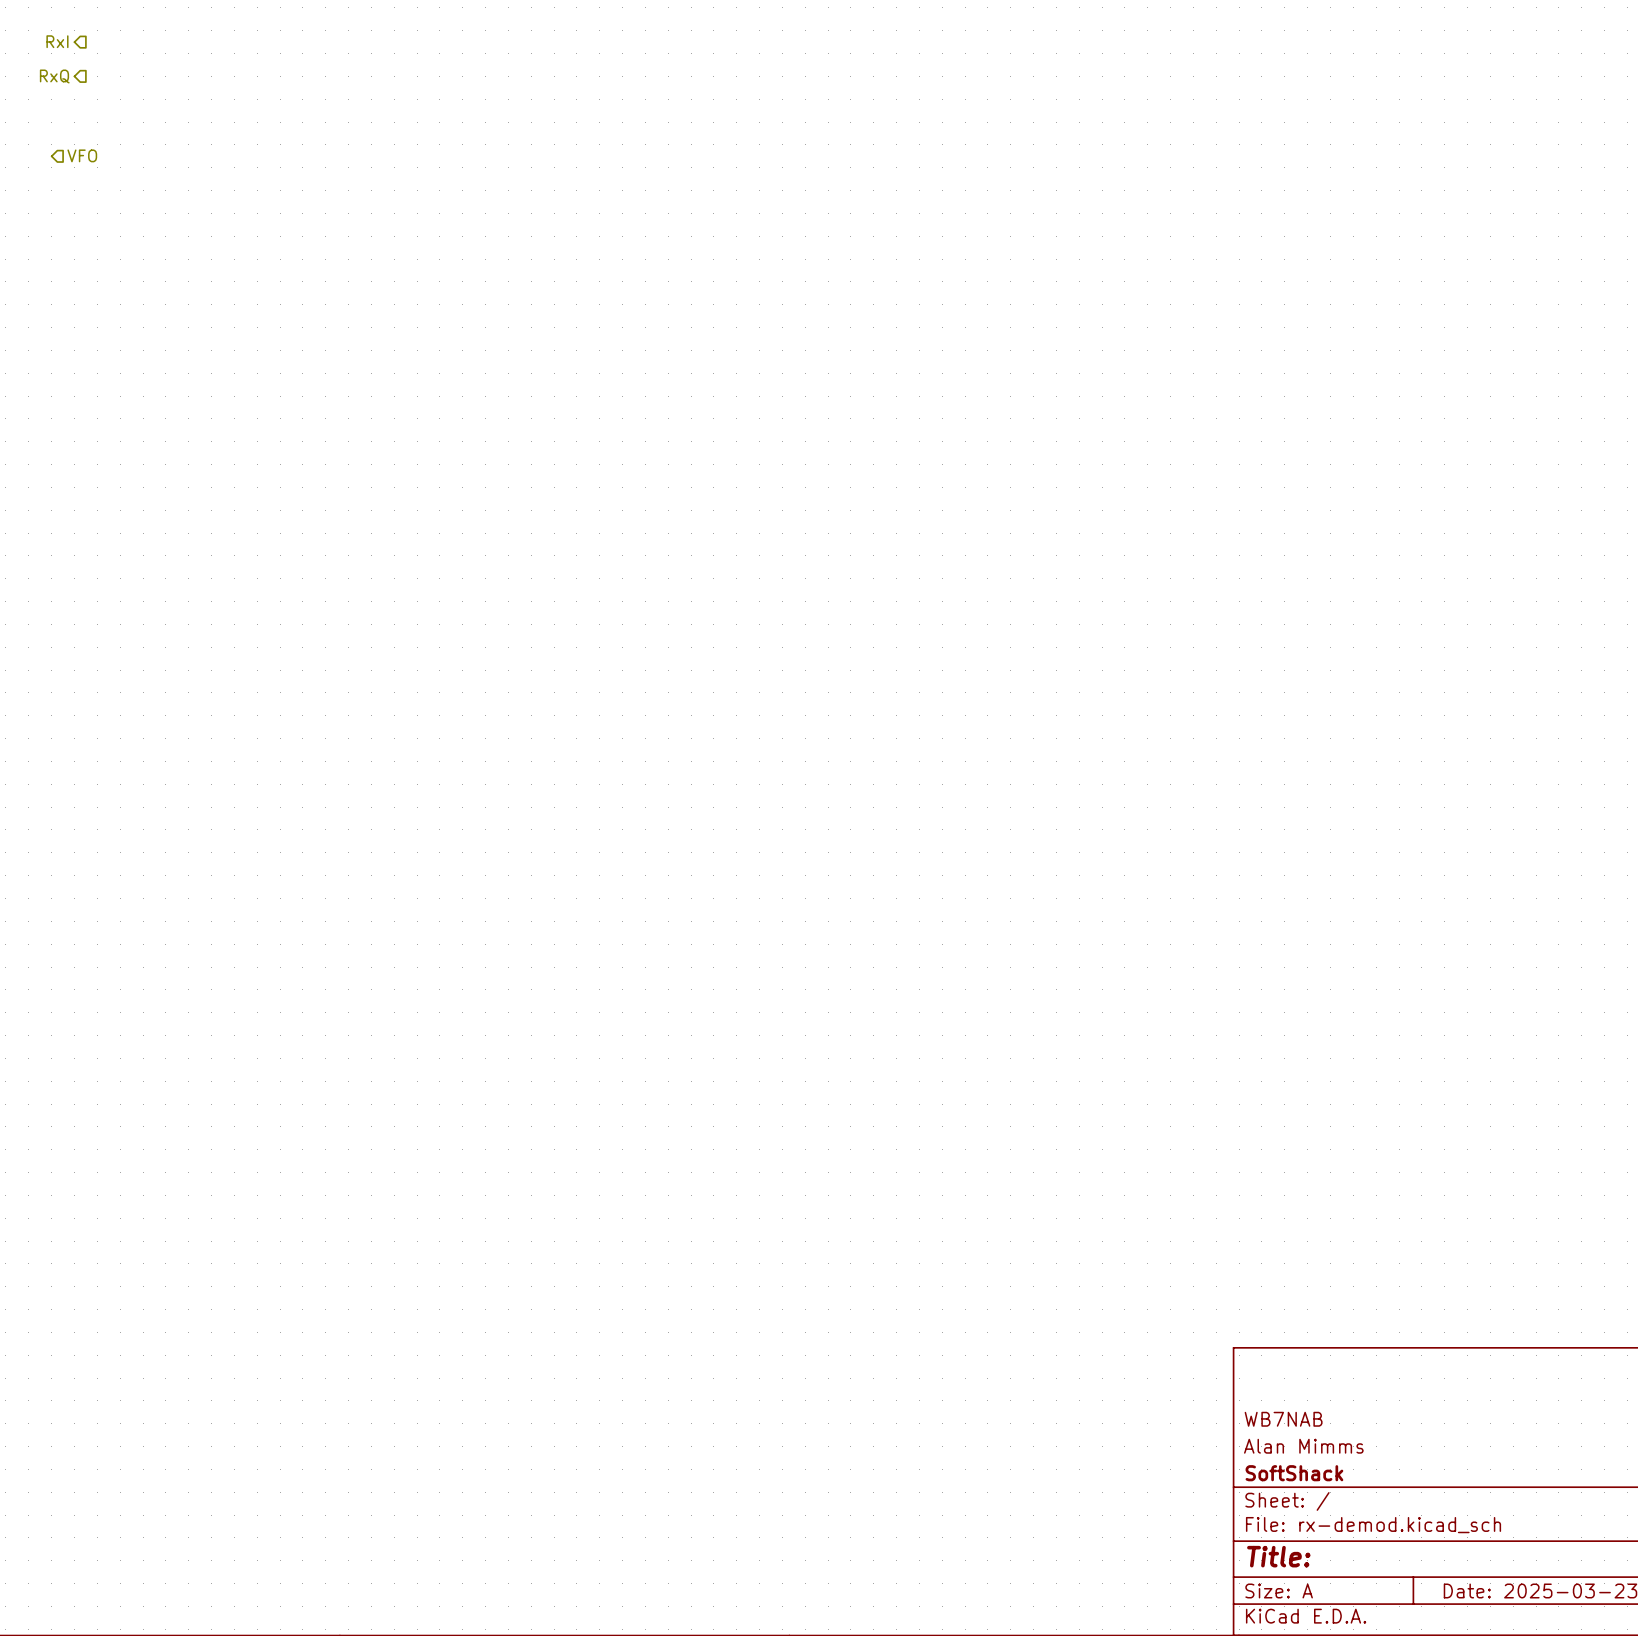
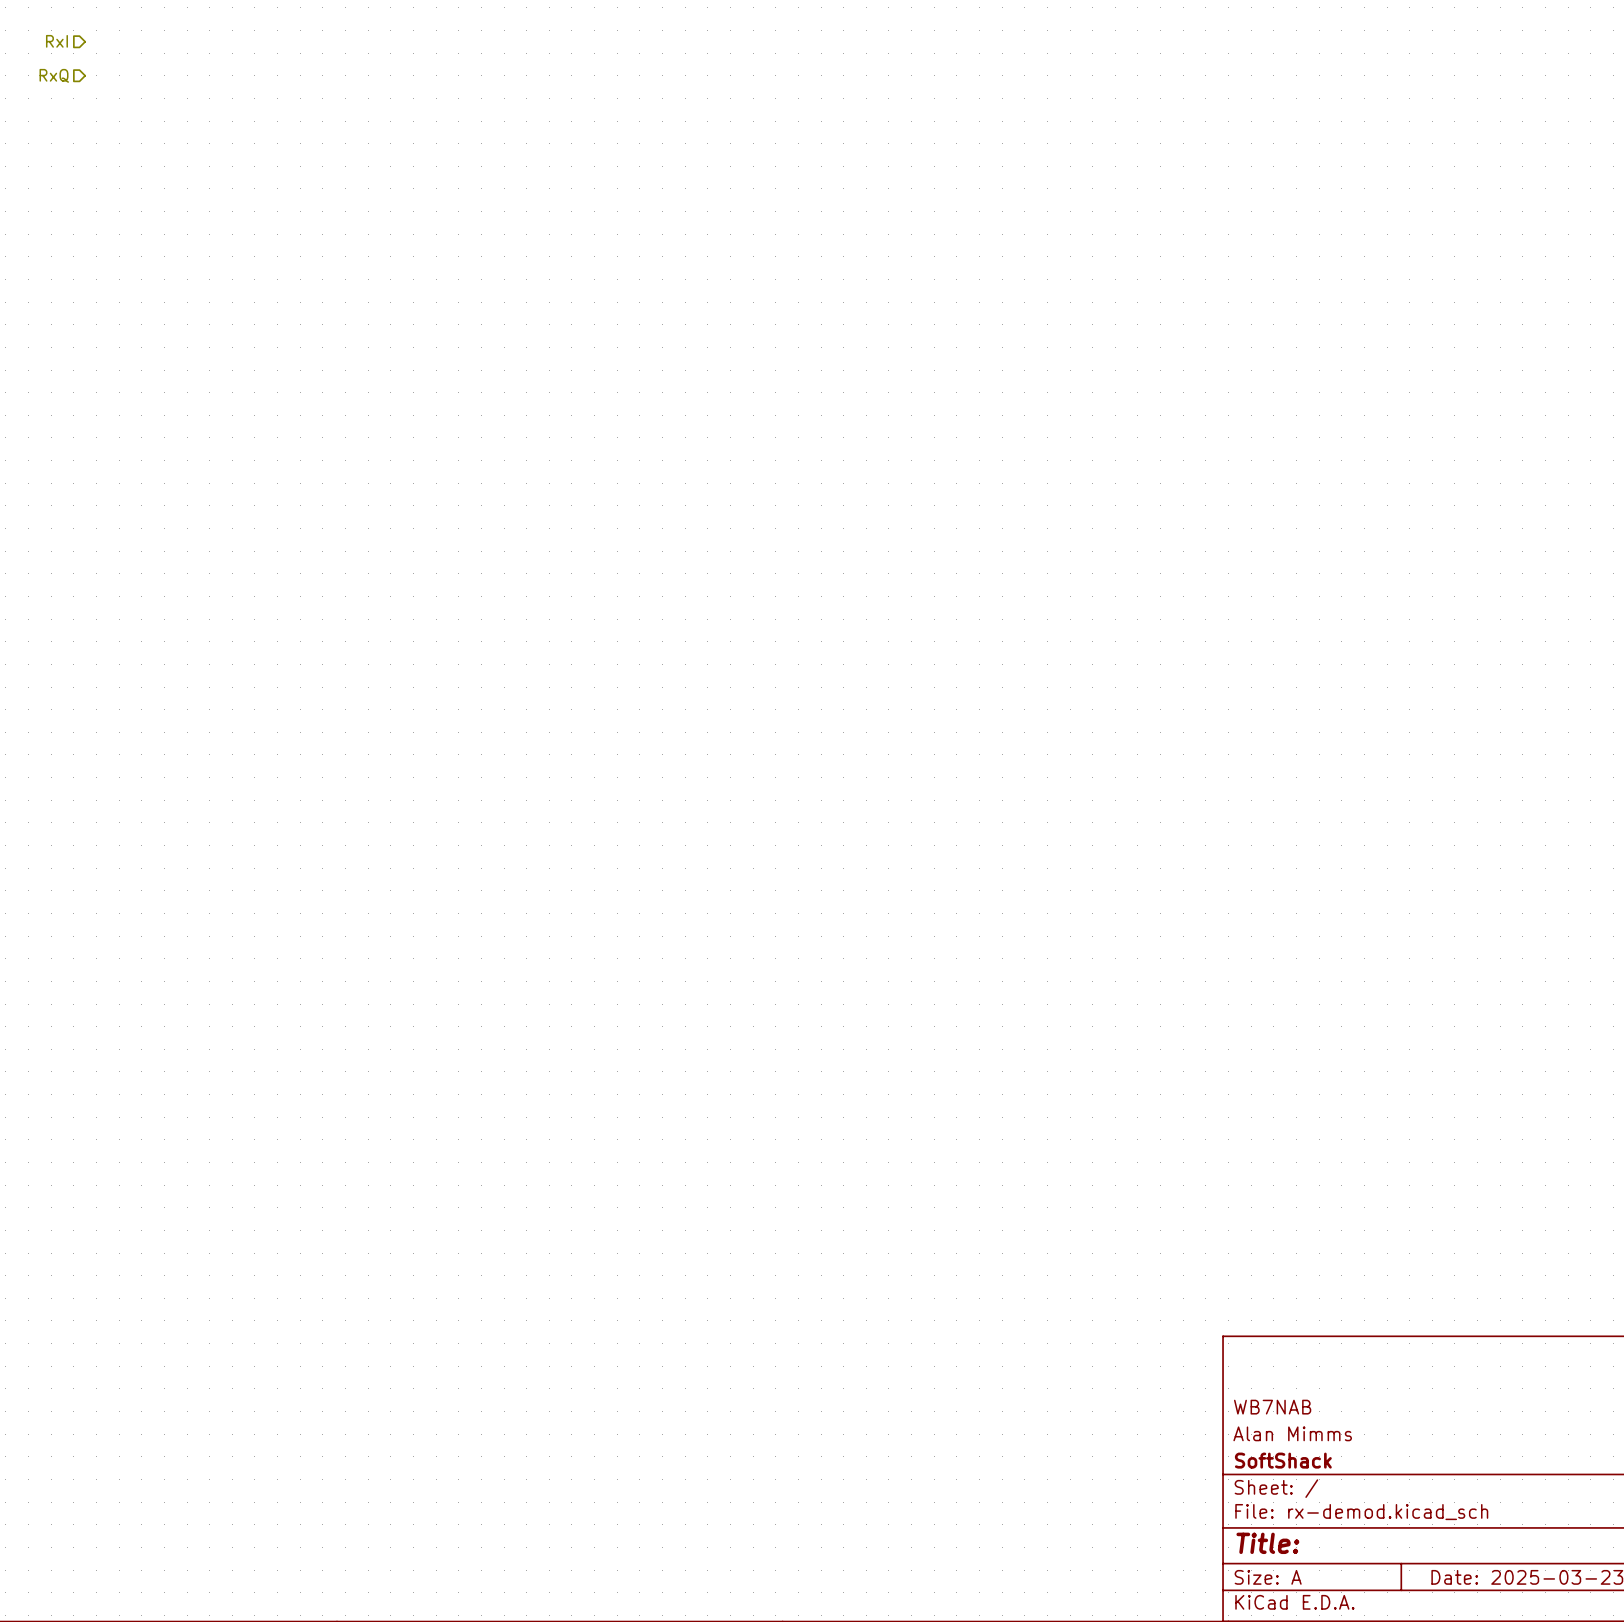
hierarchical label shape: output (57, 41) -> input (56, 41)
hierarchical label shape: output (54, 76) -> input (54, 75)
hierarchical label: VFO (82, 155) -> none

